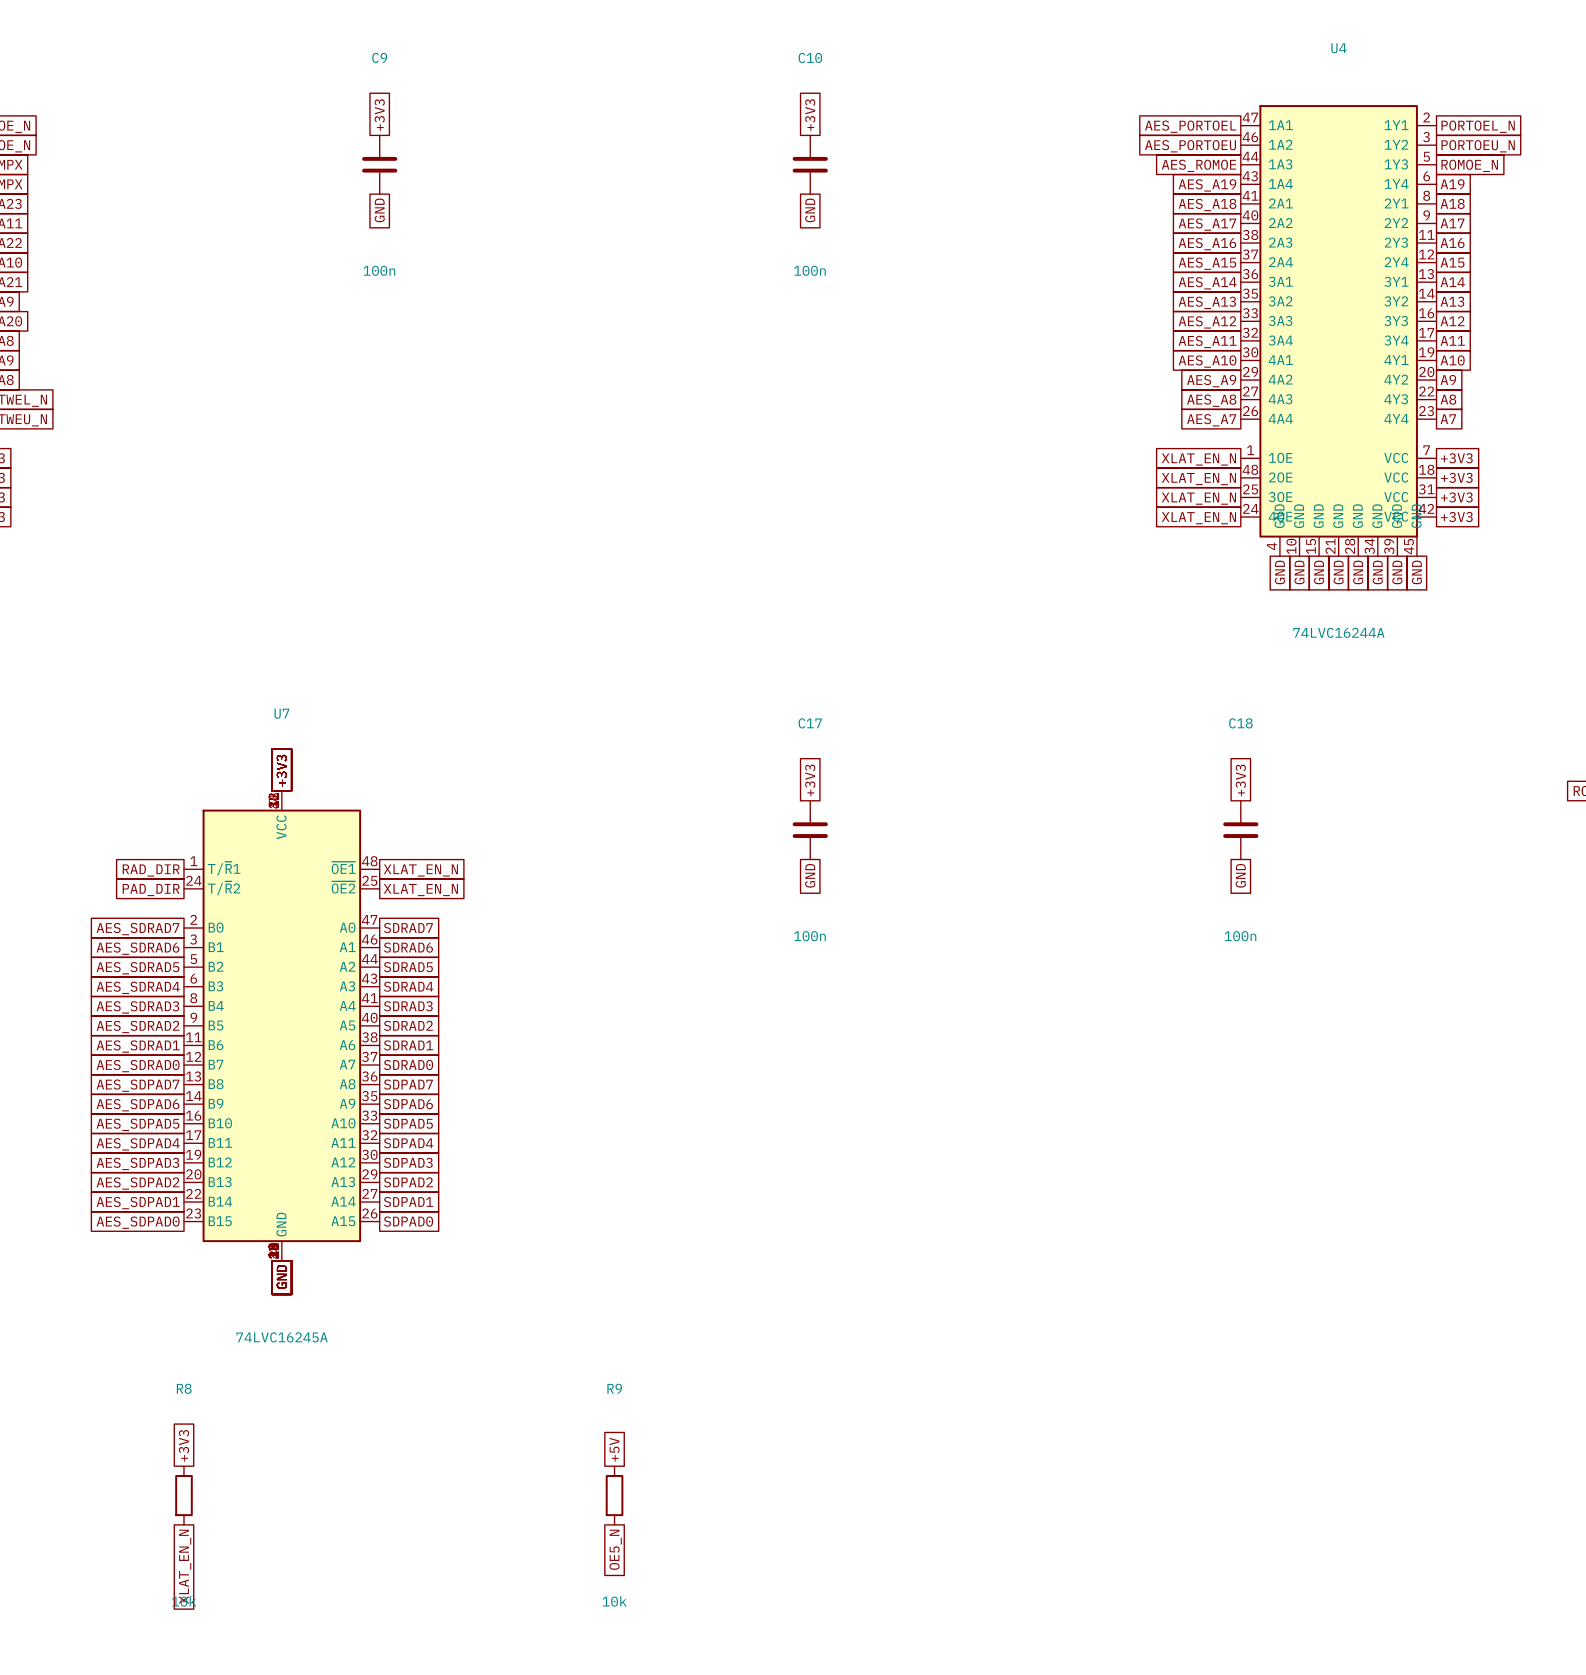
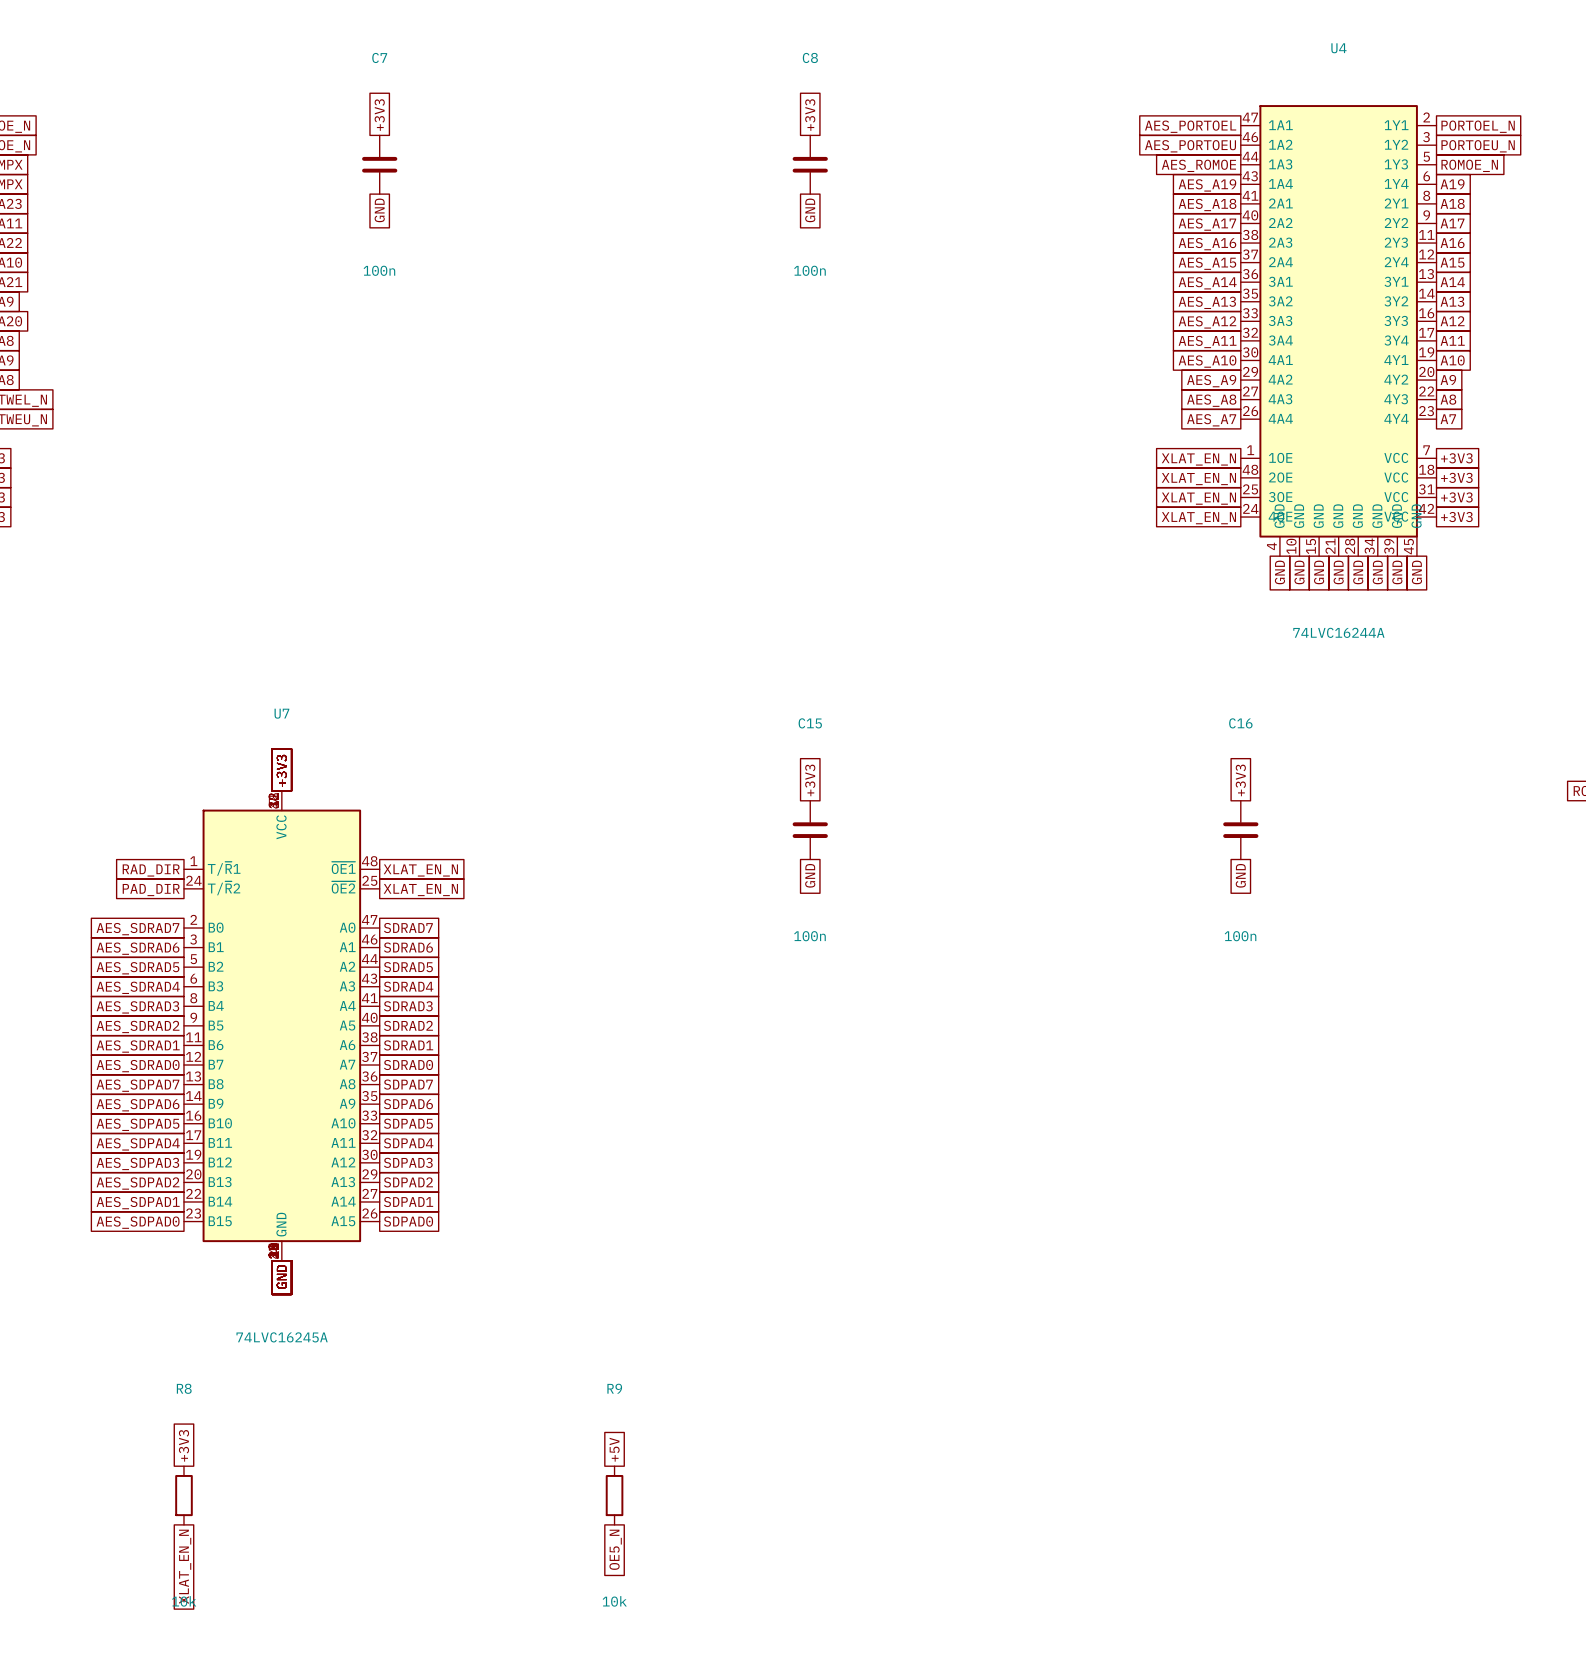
C9 name: C9 (379, 57) -> C7 (379, 57)
C10 name: C10 (810, 57) -> C8 (810, 57)
C17 name: C17 (810, 723) -> C15 (810, 723)
C18 name: C18 (1240, 723) -> C16 (1240, 723)

